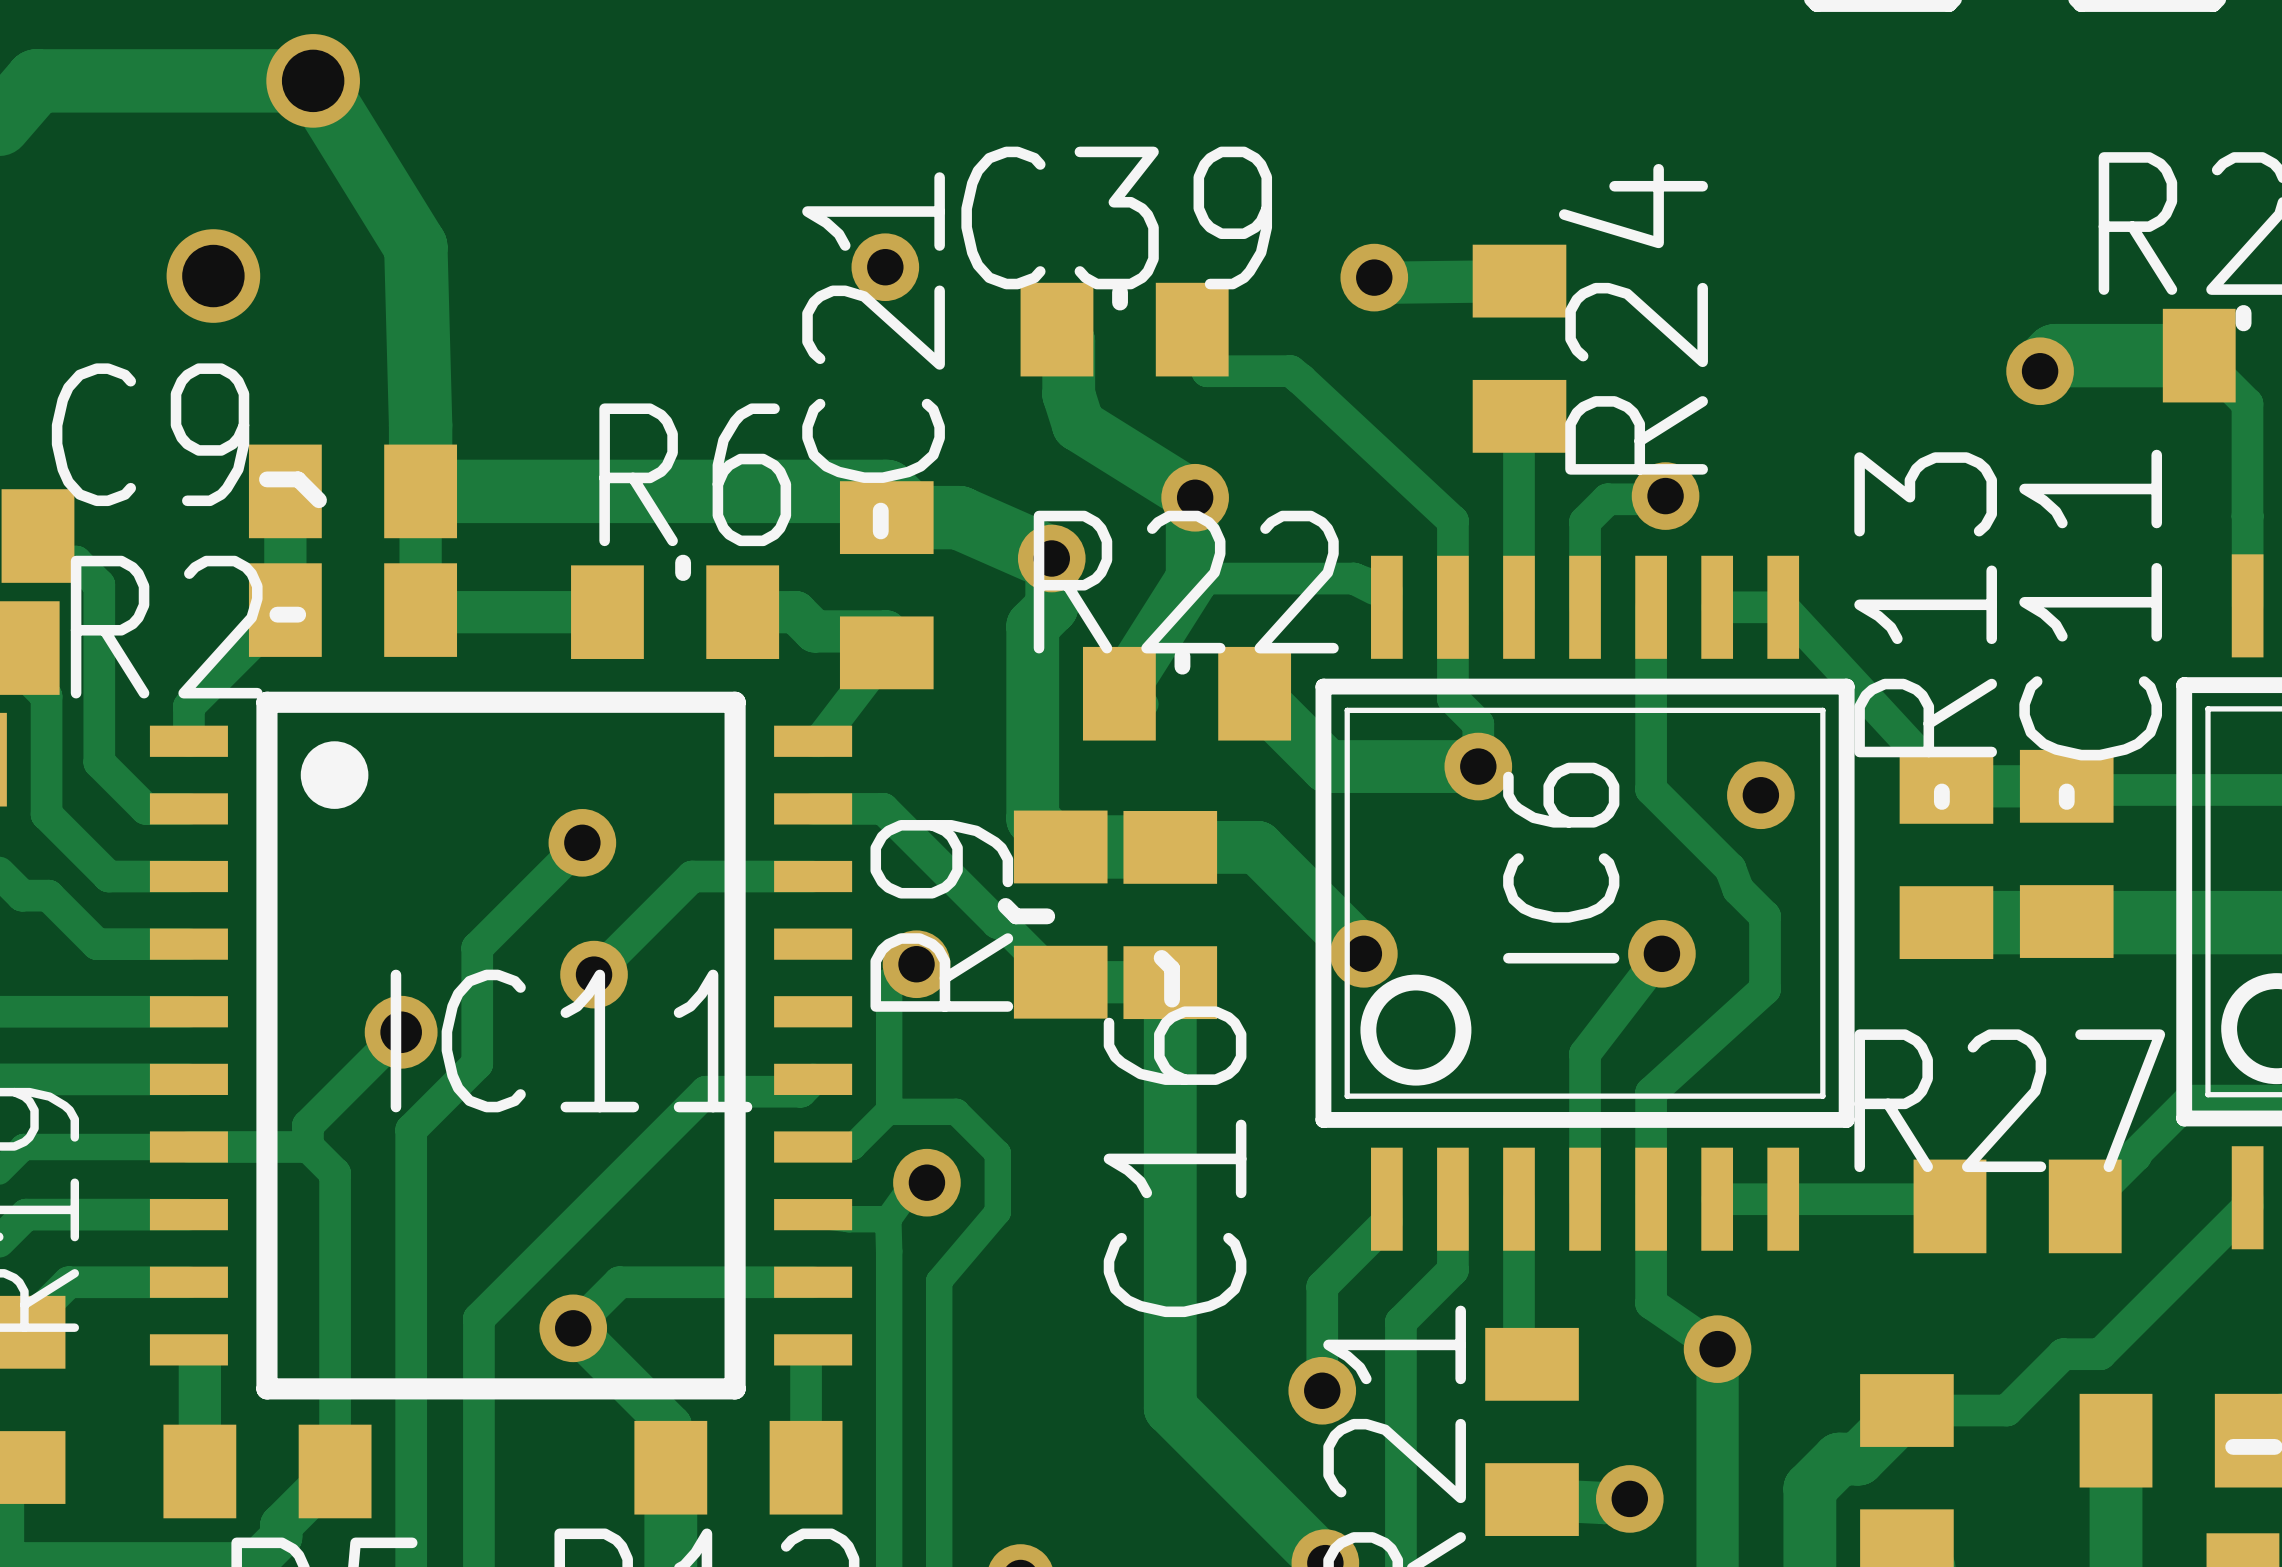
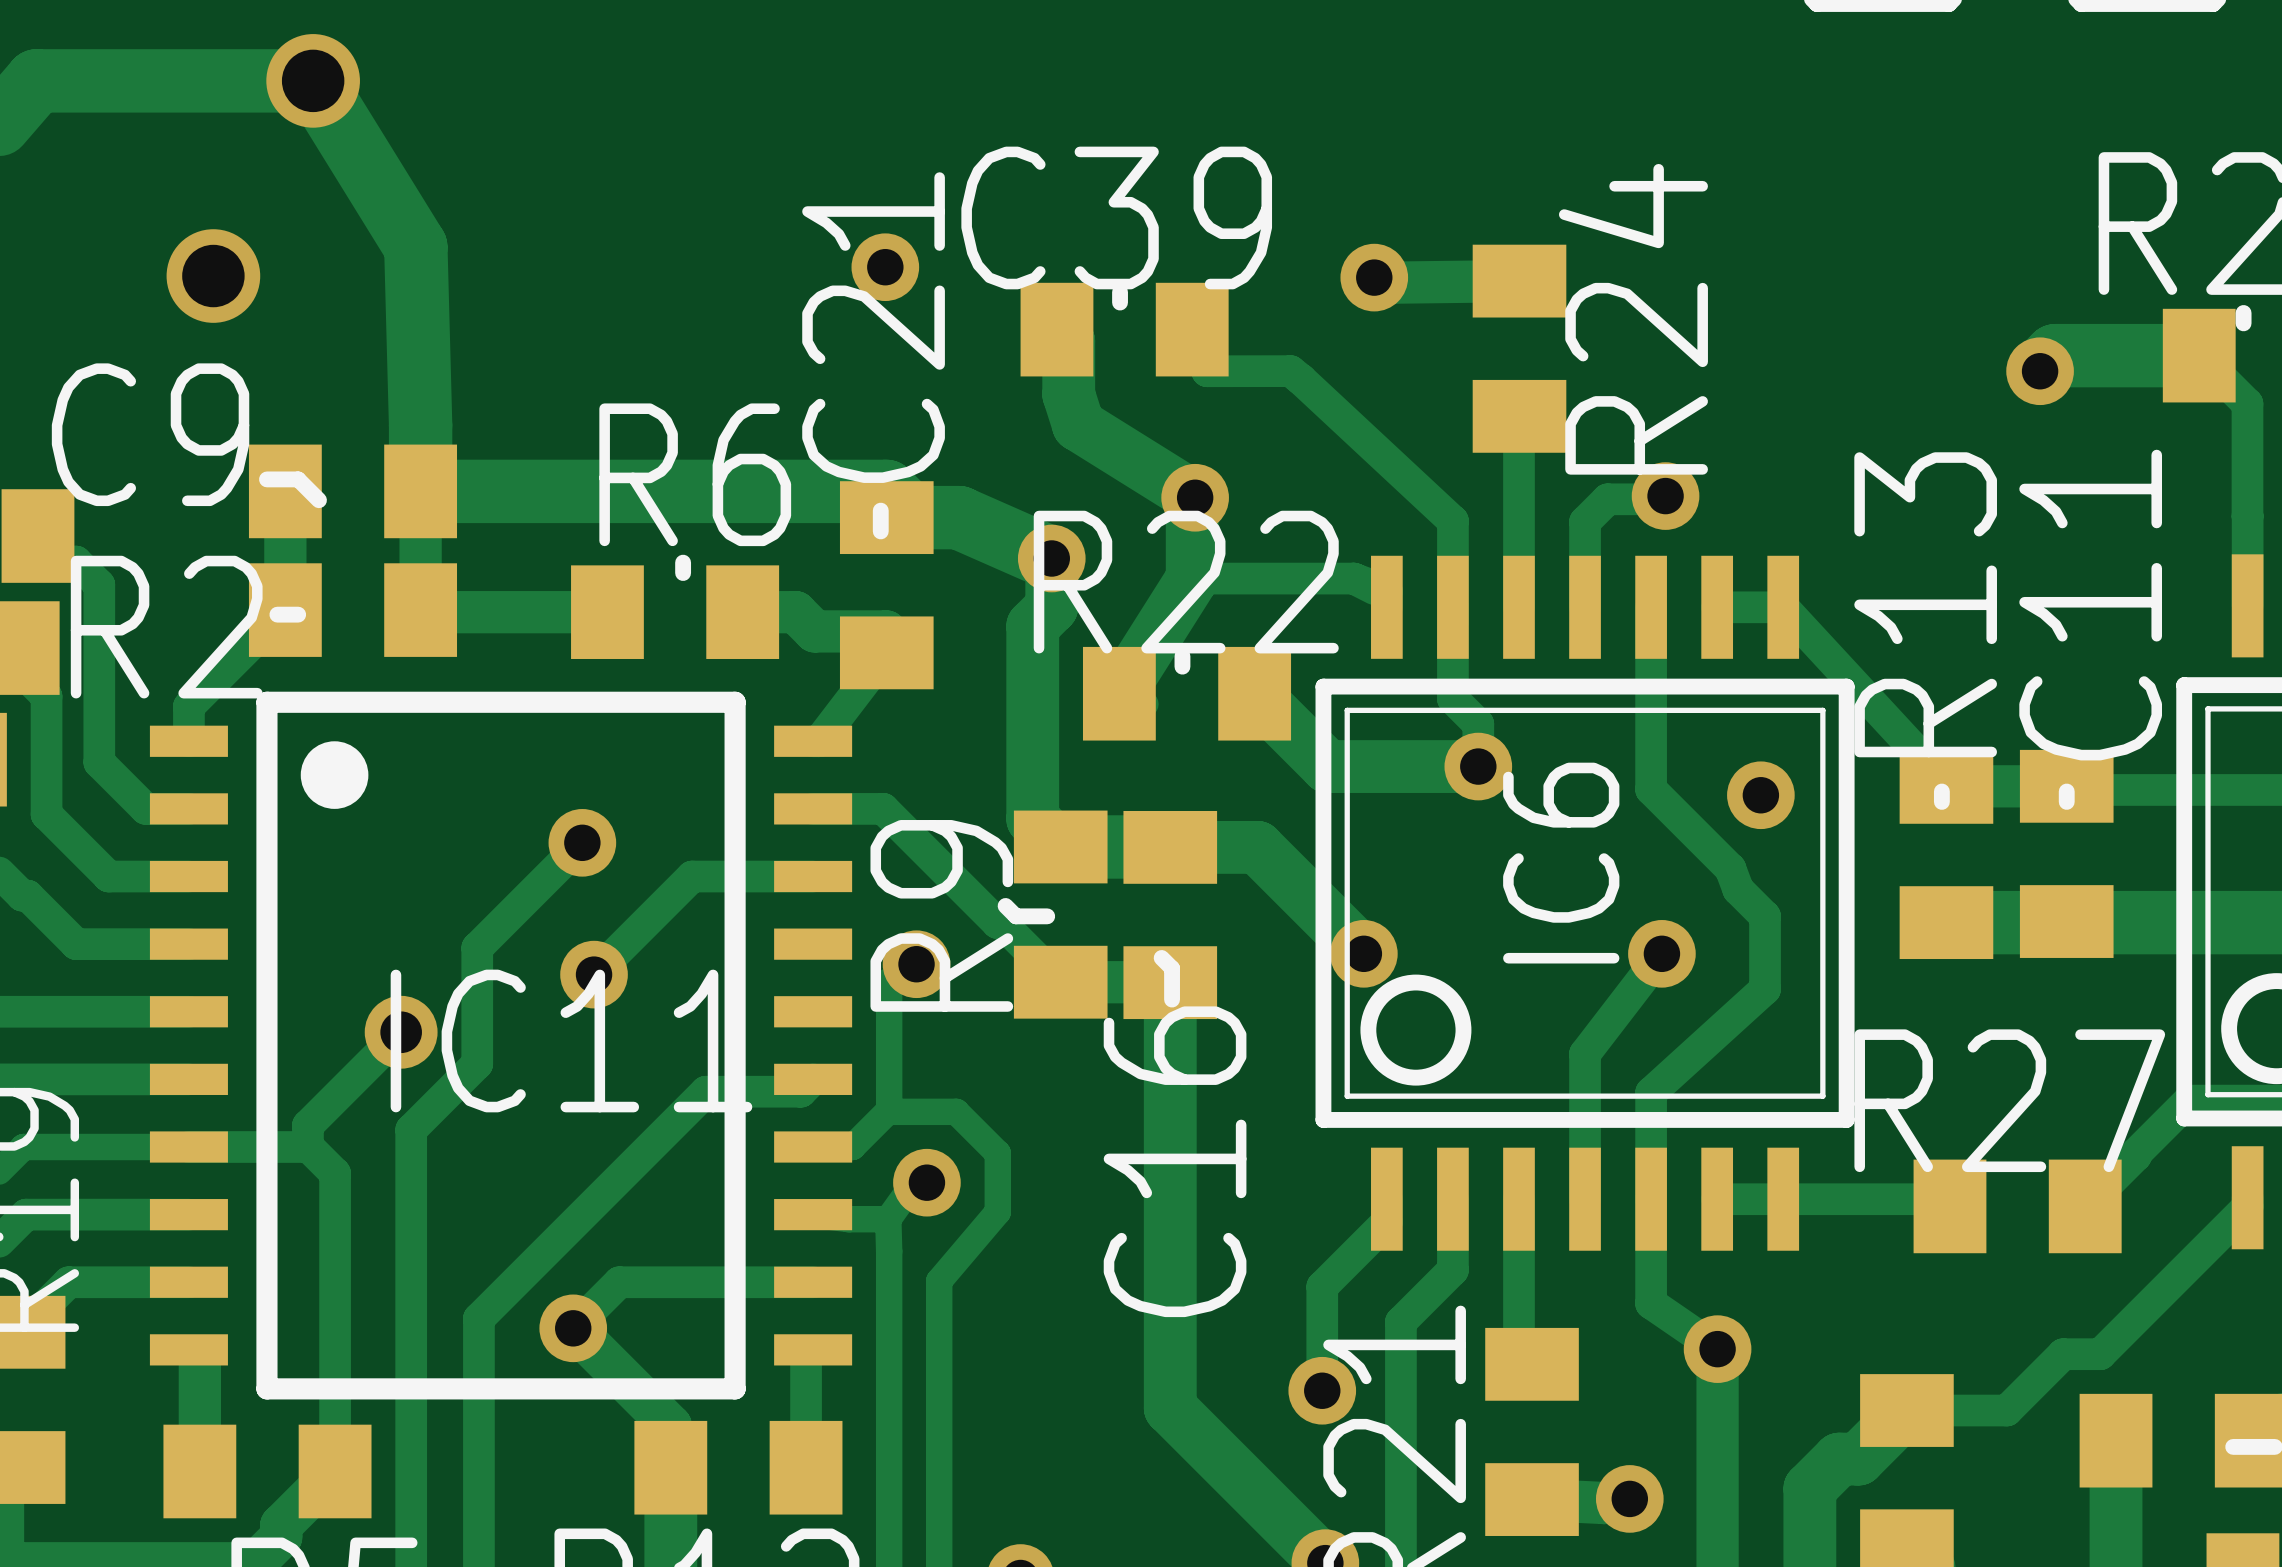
track: (27, 895) (48, 895) (97, 944) -> (27, 895) (76, 944) (97, 944)

